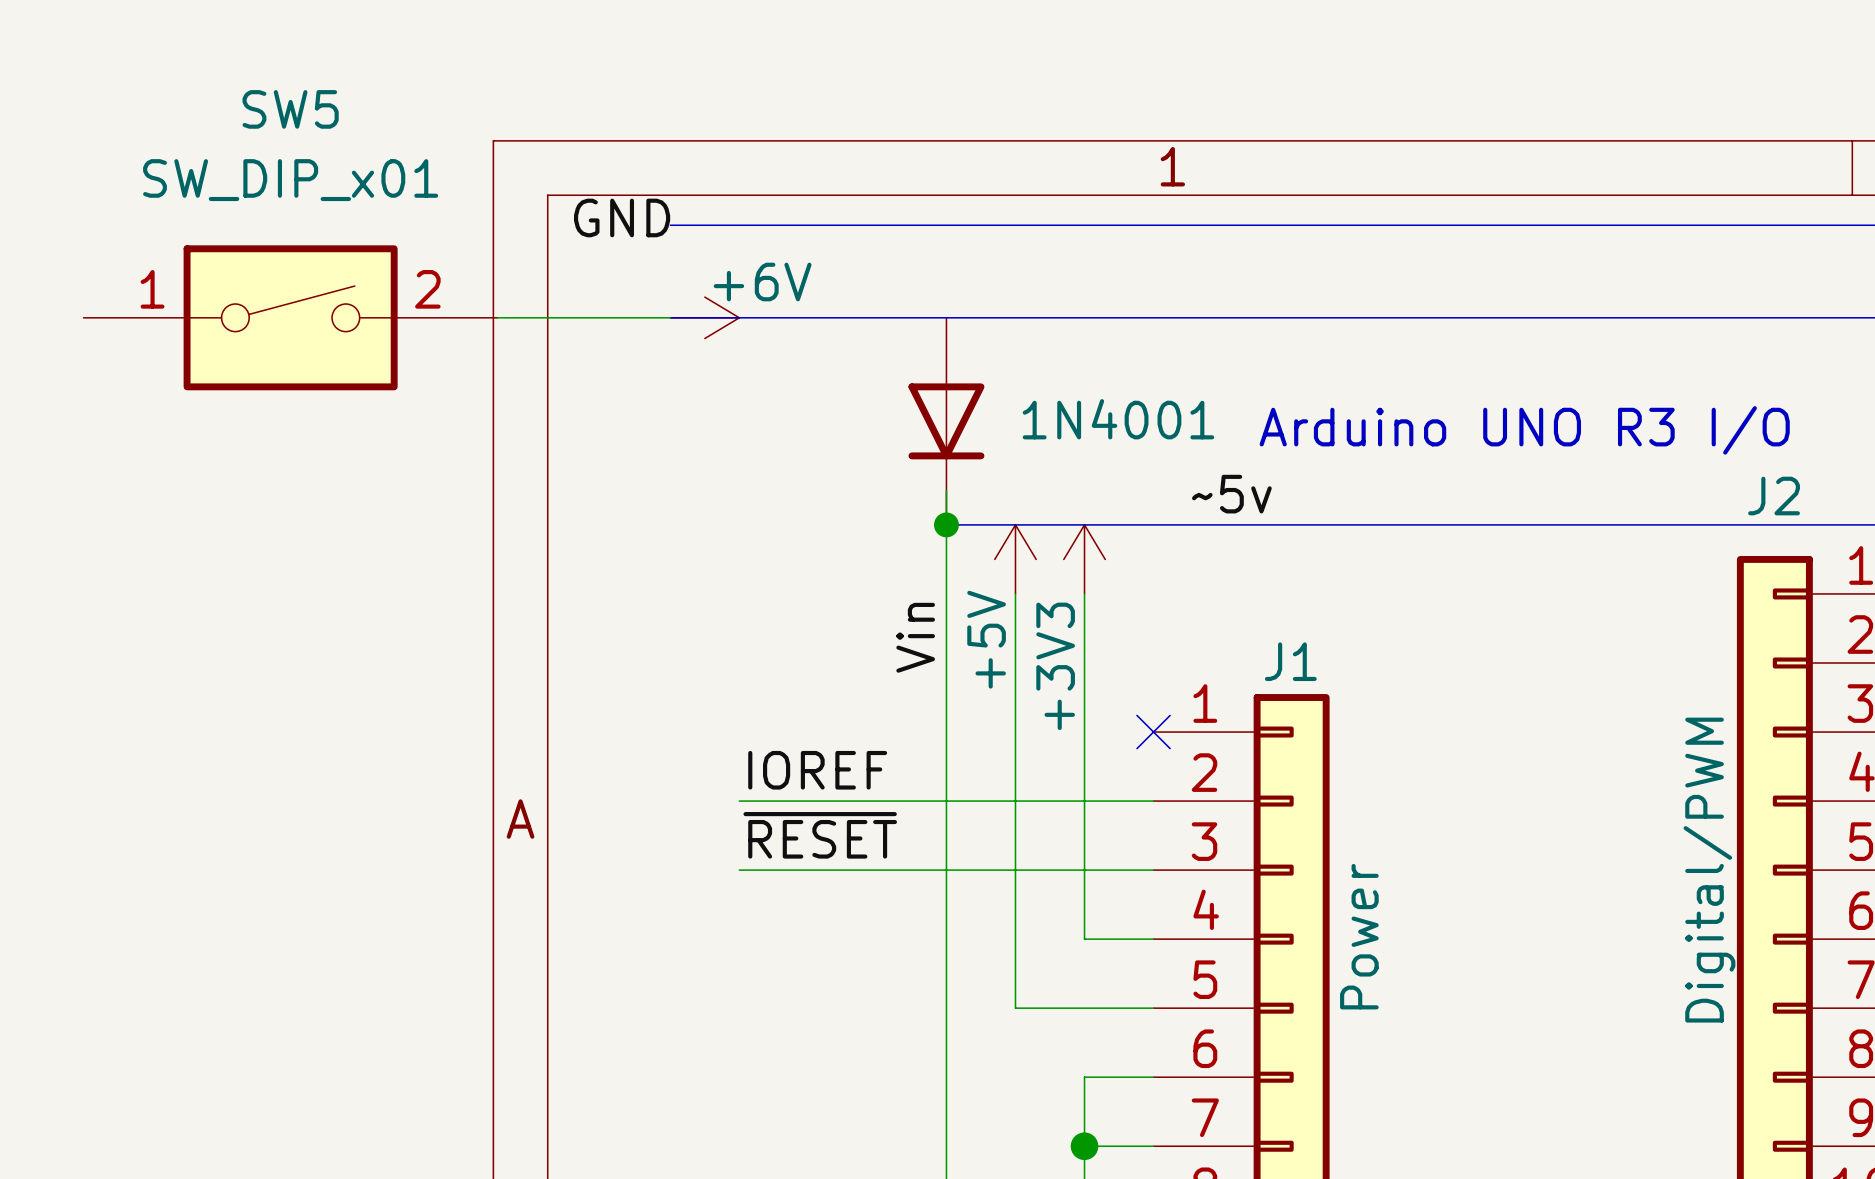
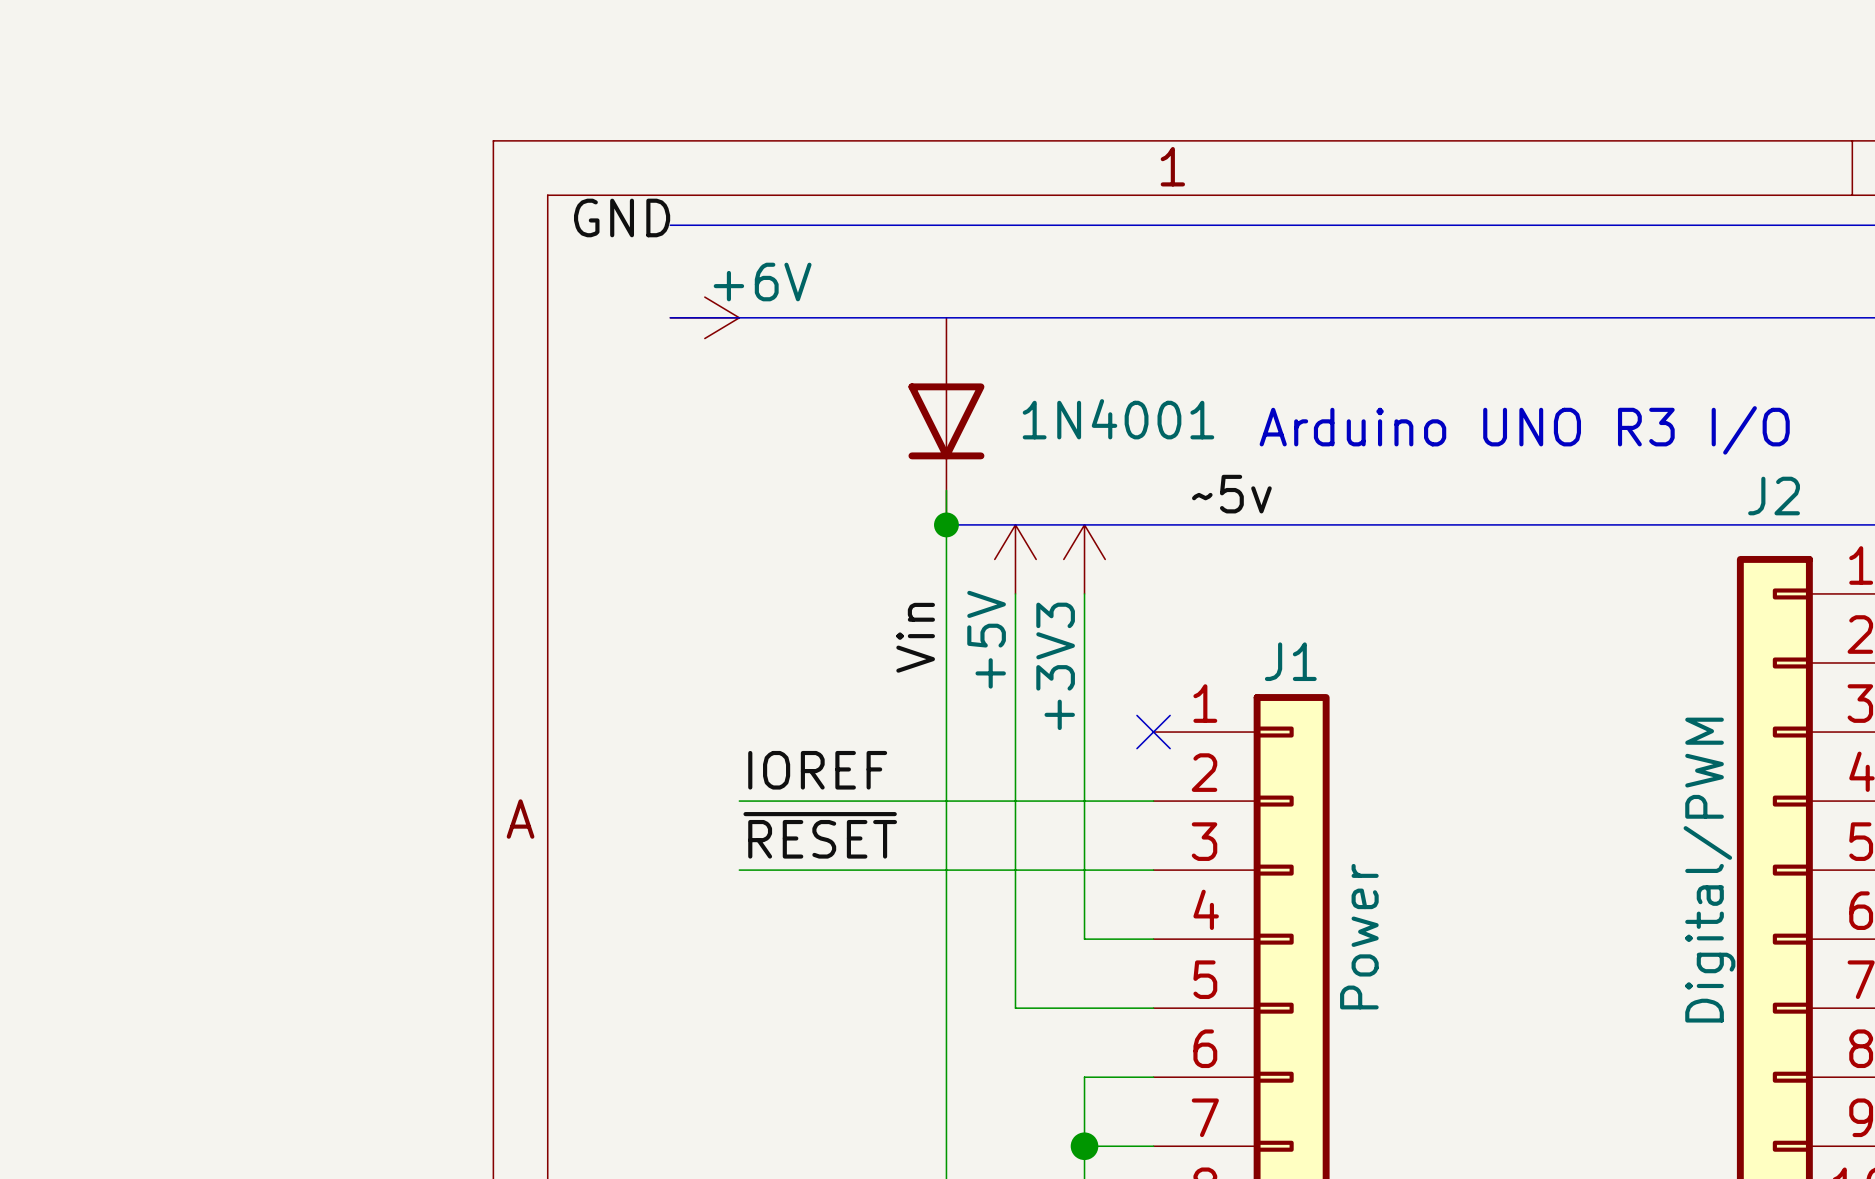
SW5: SW_DIP_x01 (290, 317) -> none
wire: (497, 317) (670, 317) -> none

